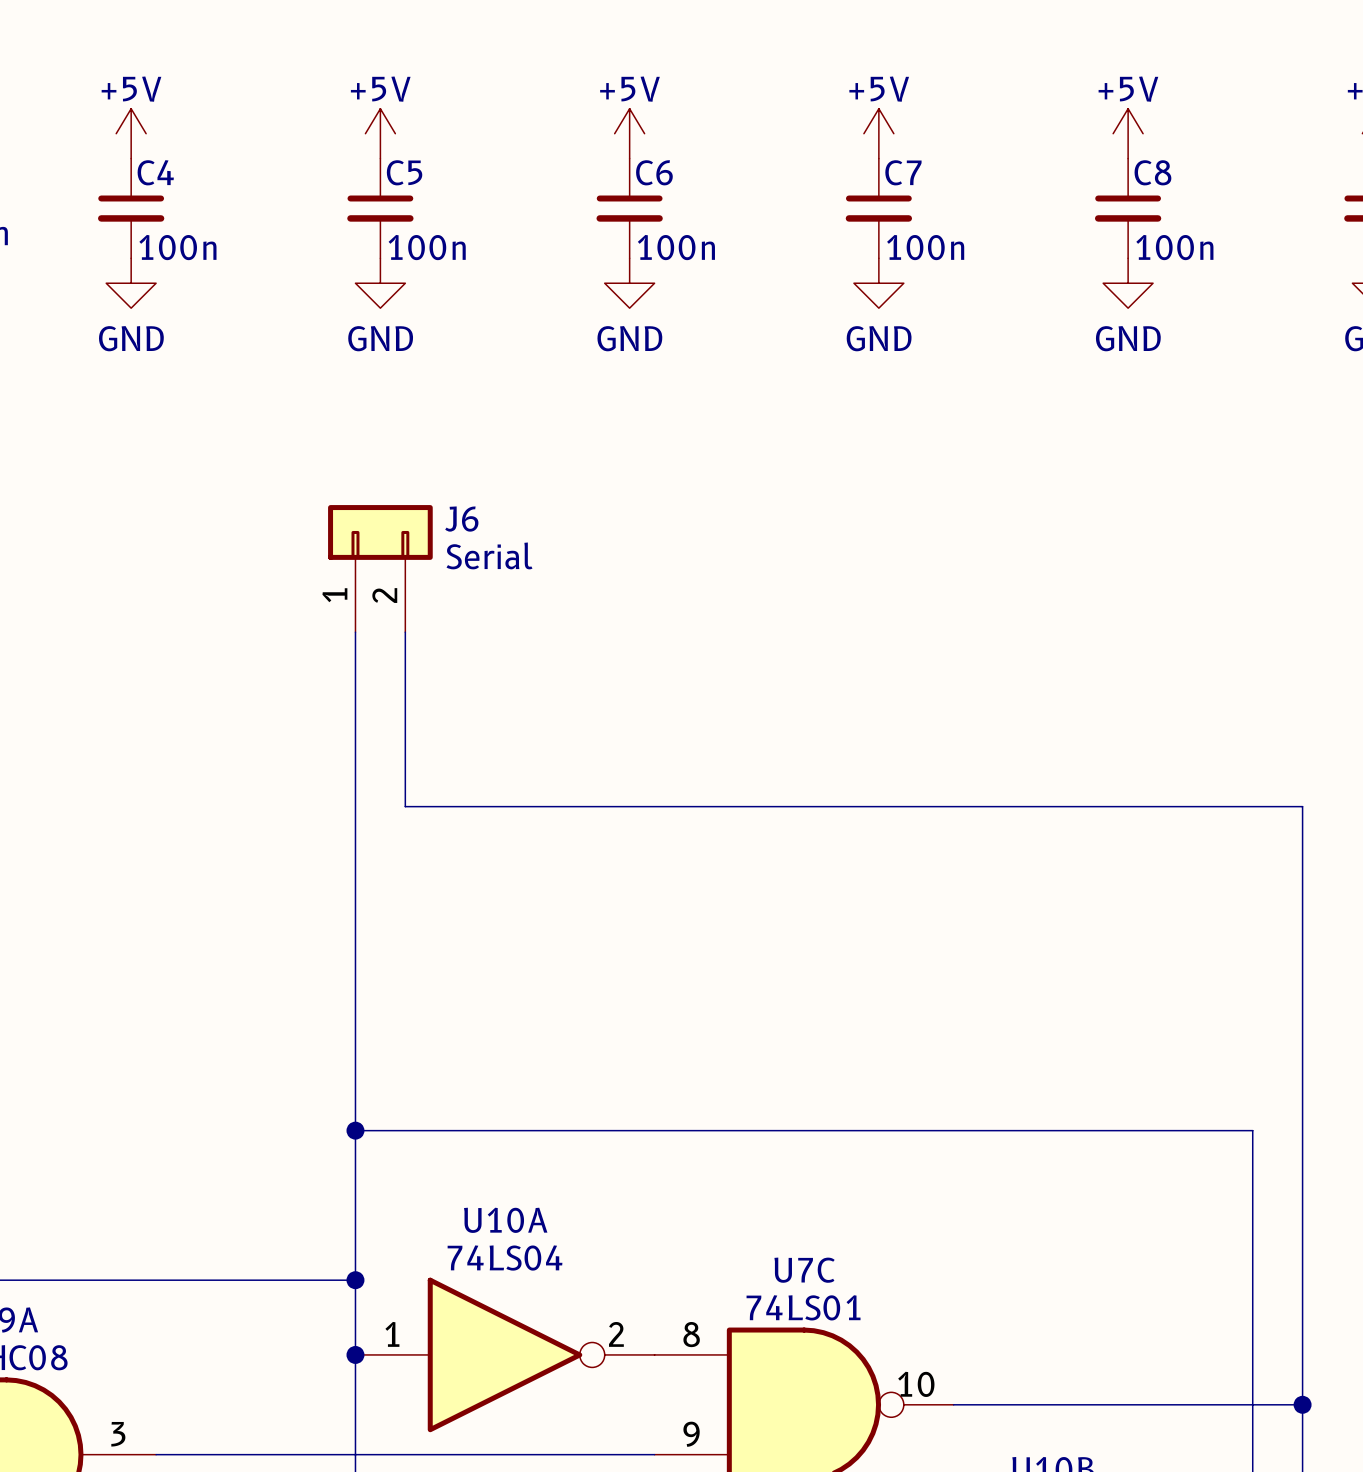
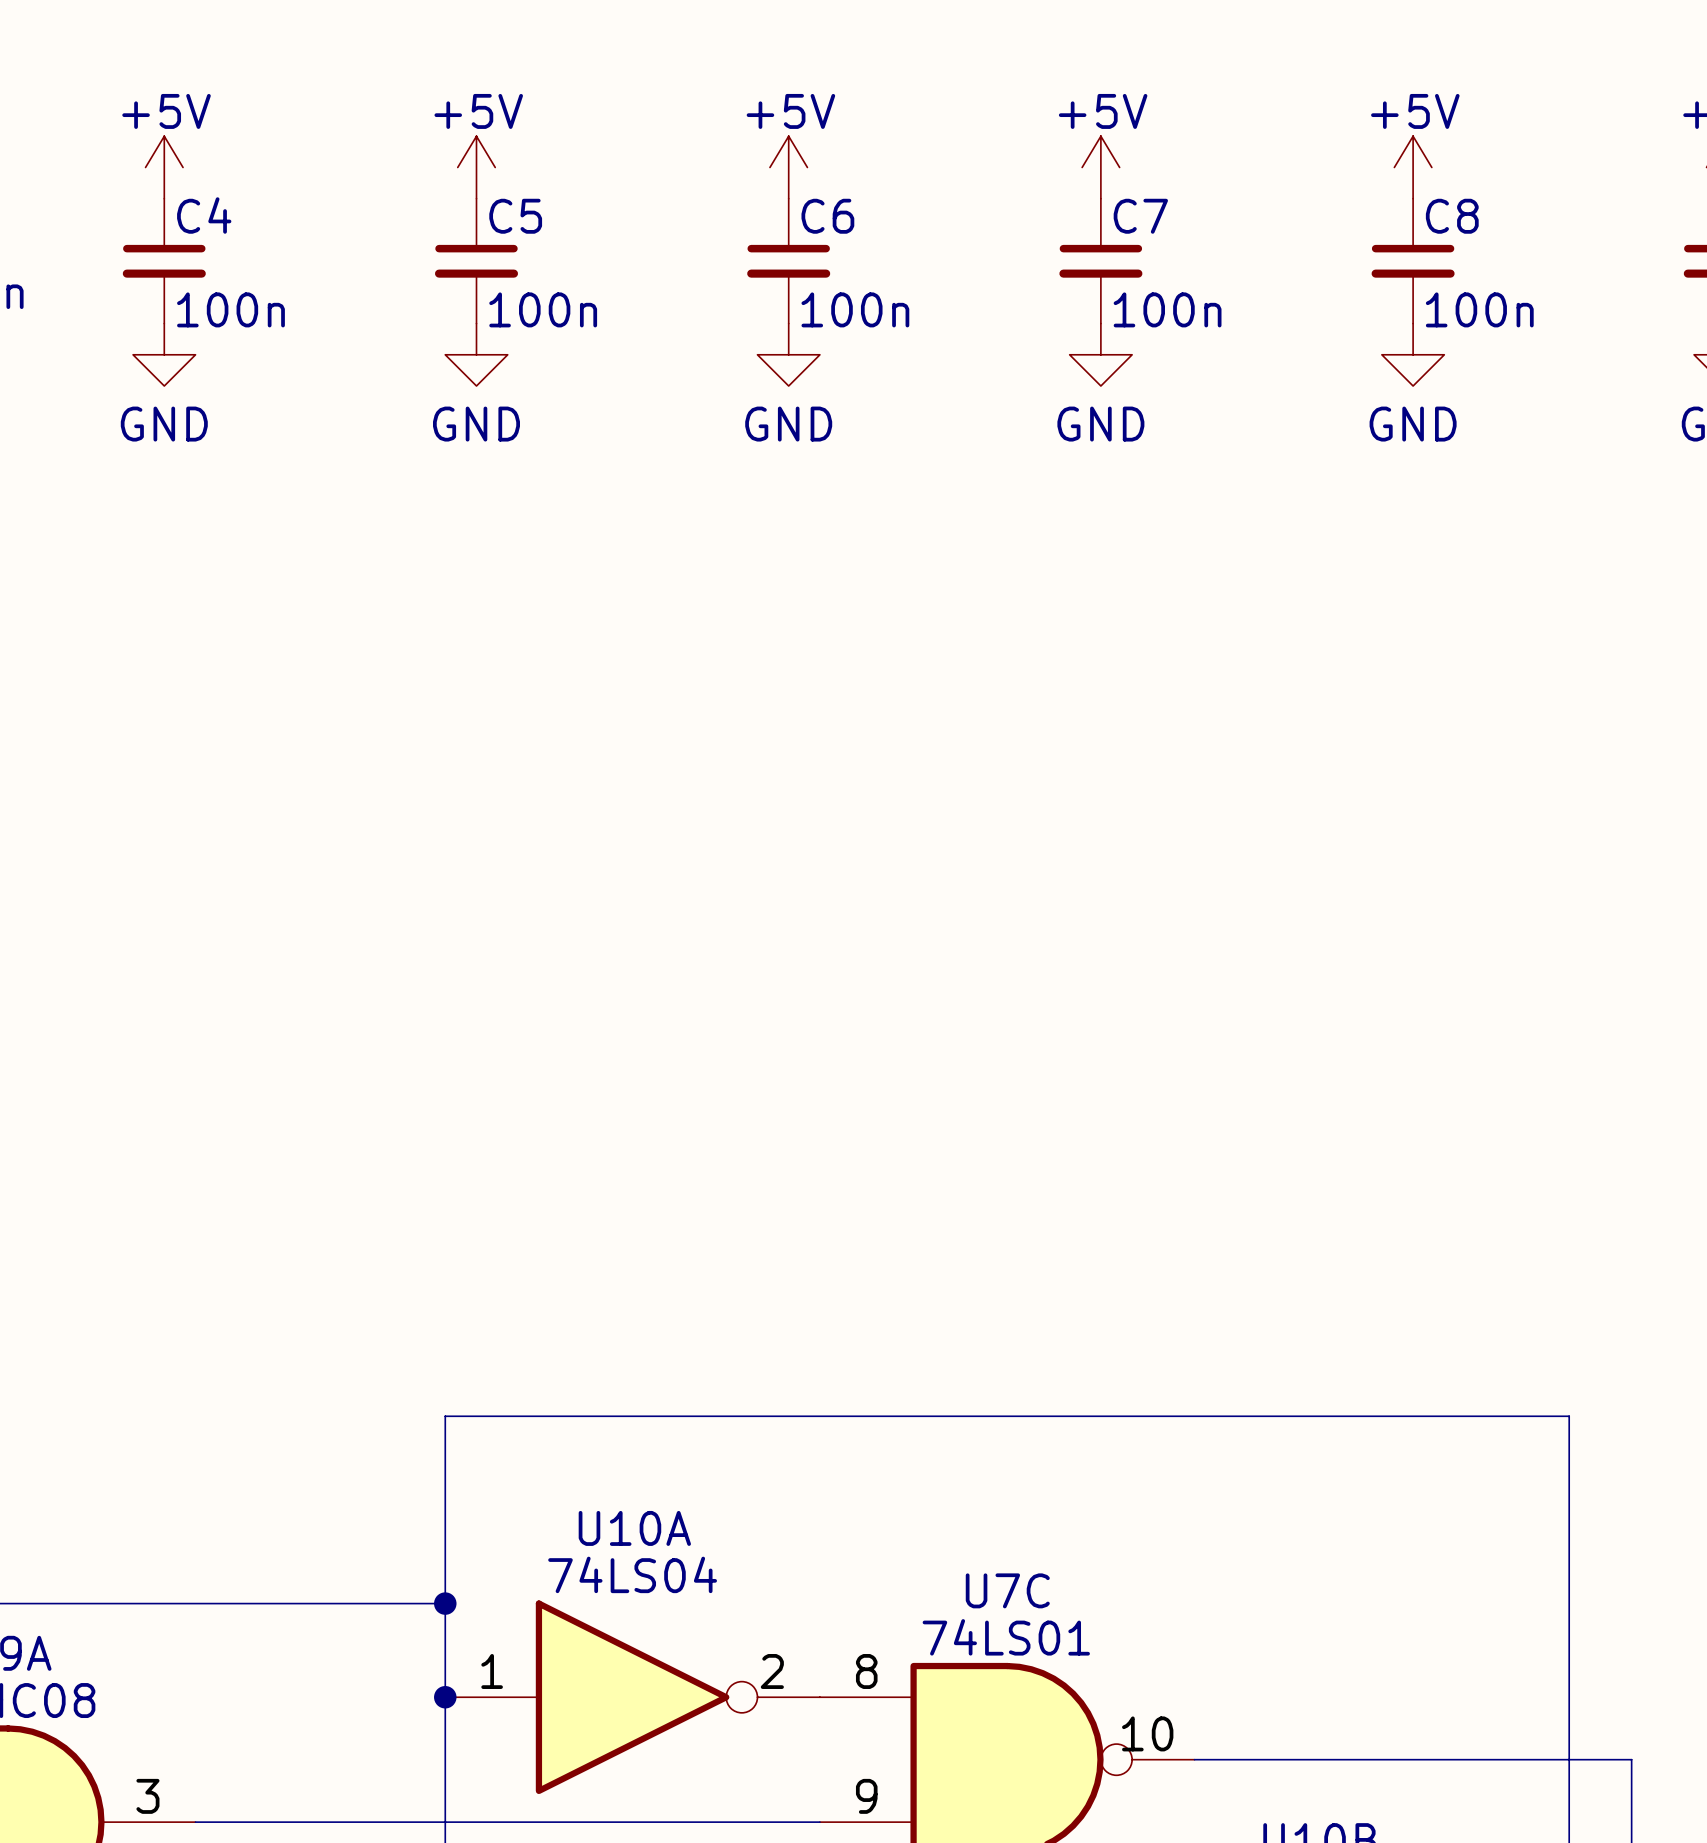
J6: Serial (380, 568) -> none
wire: (355, 632) (355, 1130) -> none
wire: (405, 632) (405, 806) (1302, 806) (1302, 1404) -> none
junction: (355, 1130) -> none
junction: (1302, 1404) -> none

